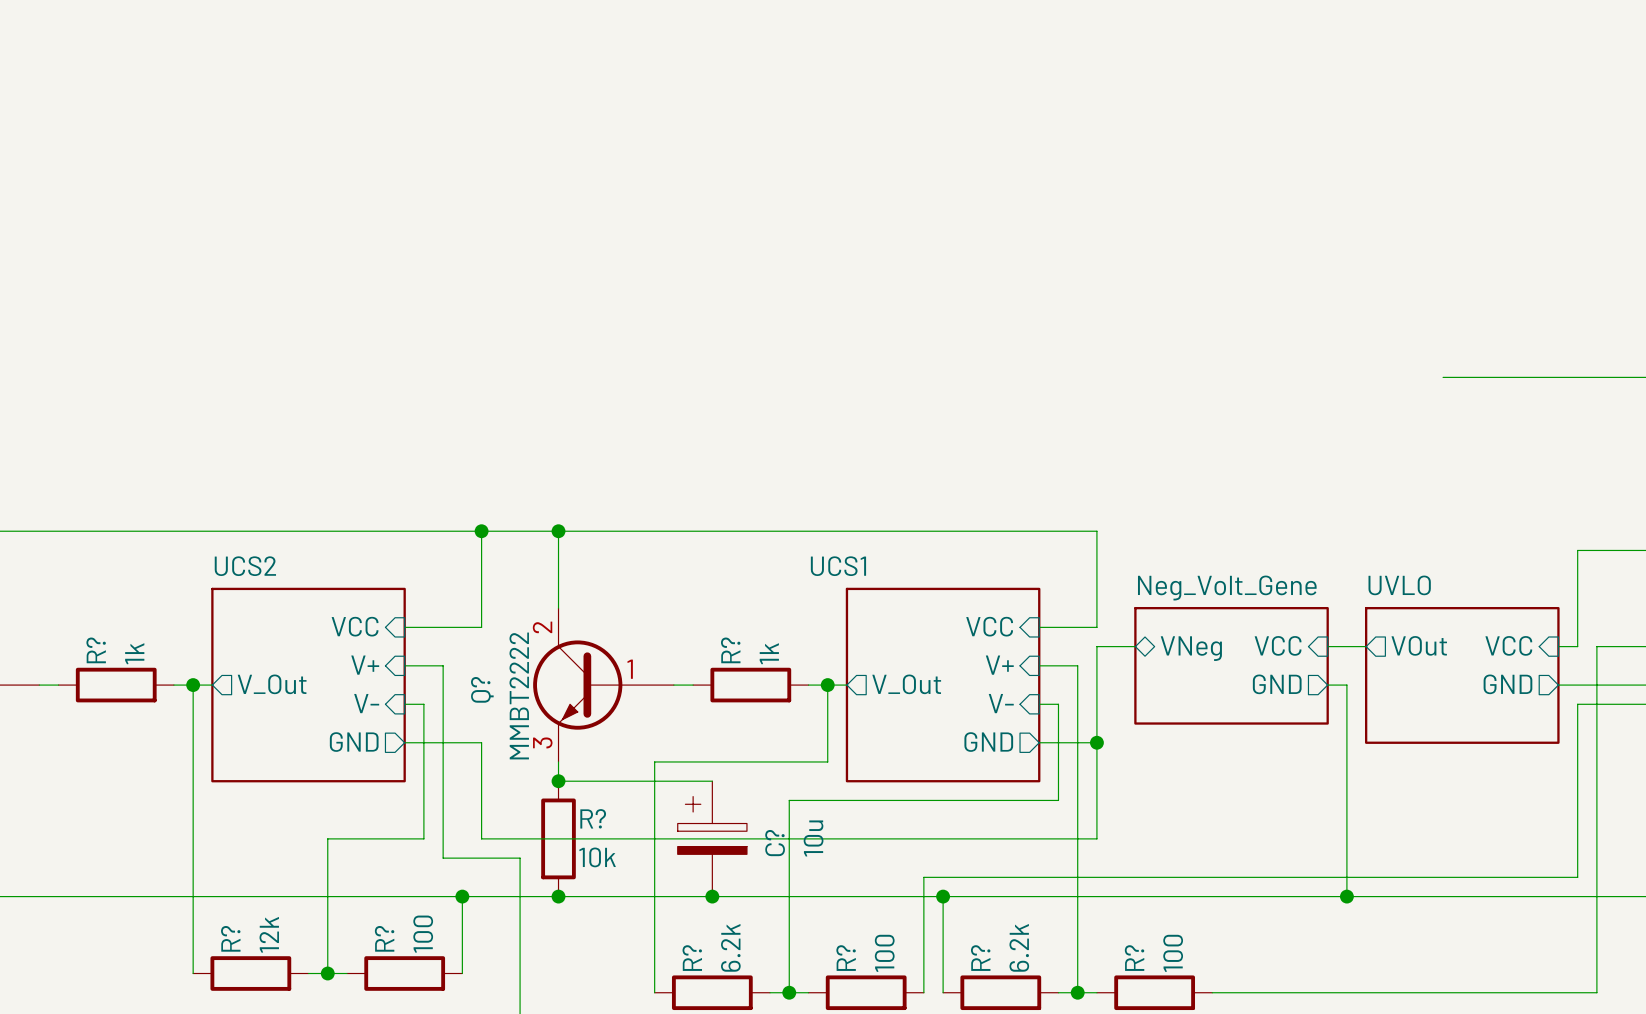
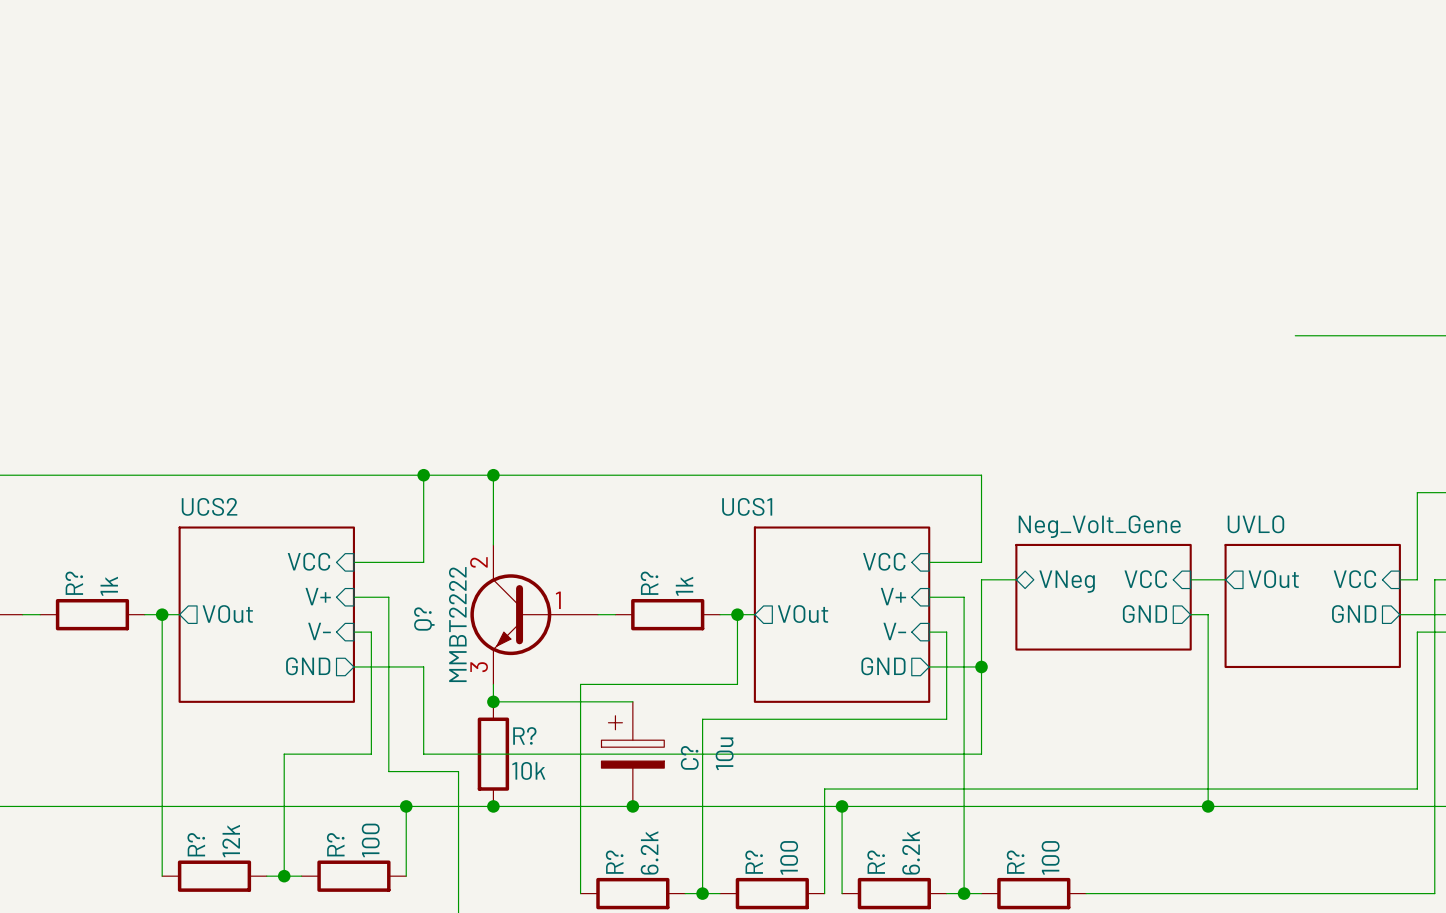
sheet pin: V_Out (272, 684) -> VOut (227, 614)
sheet pin: V_Out (906, 684) -> VOut (803, 614)

